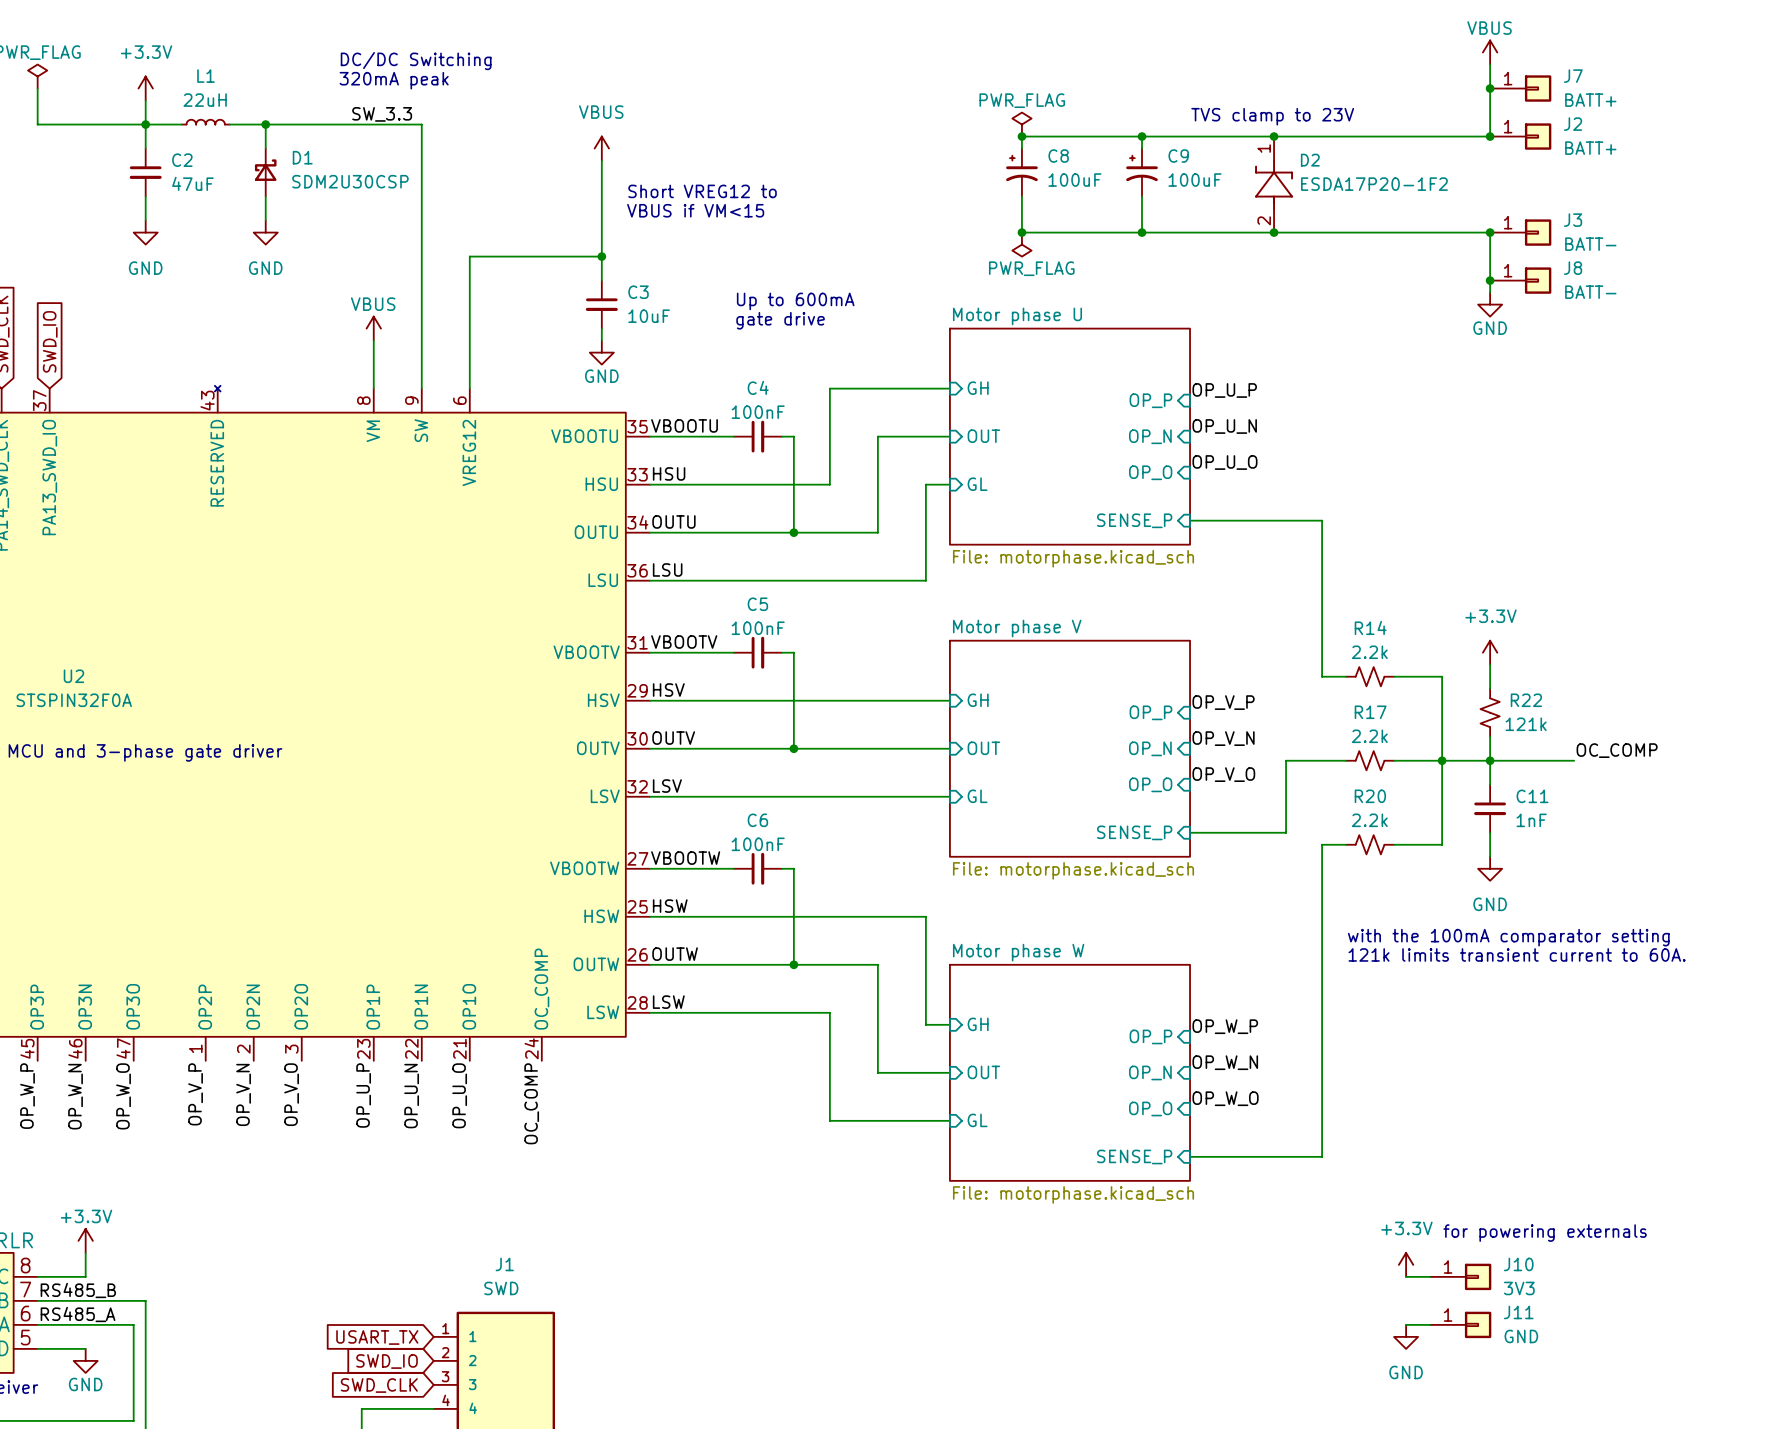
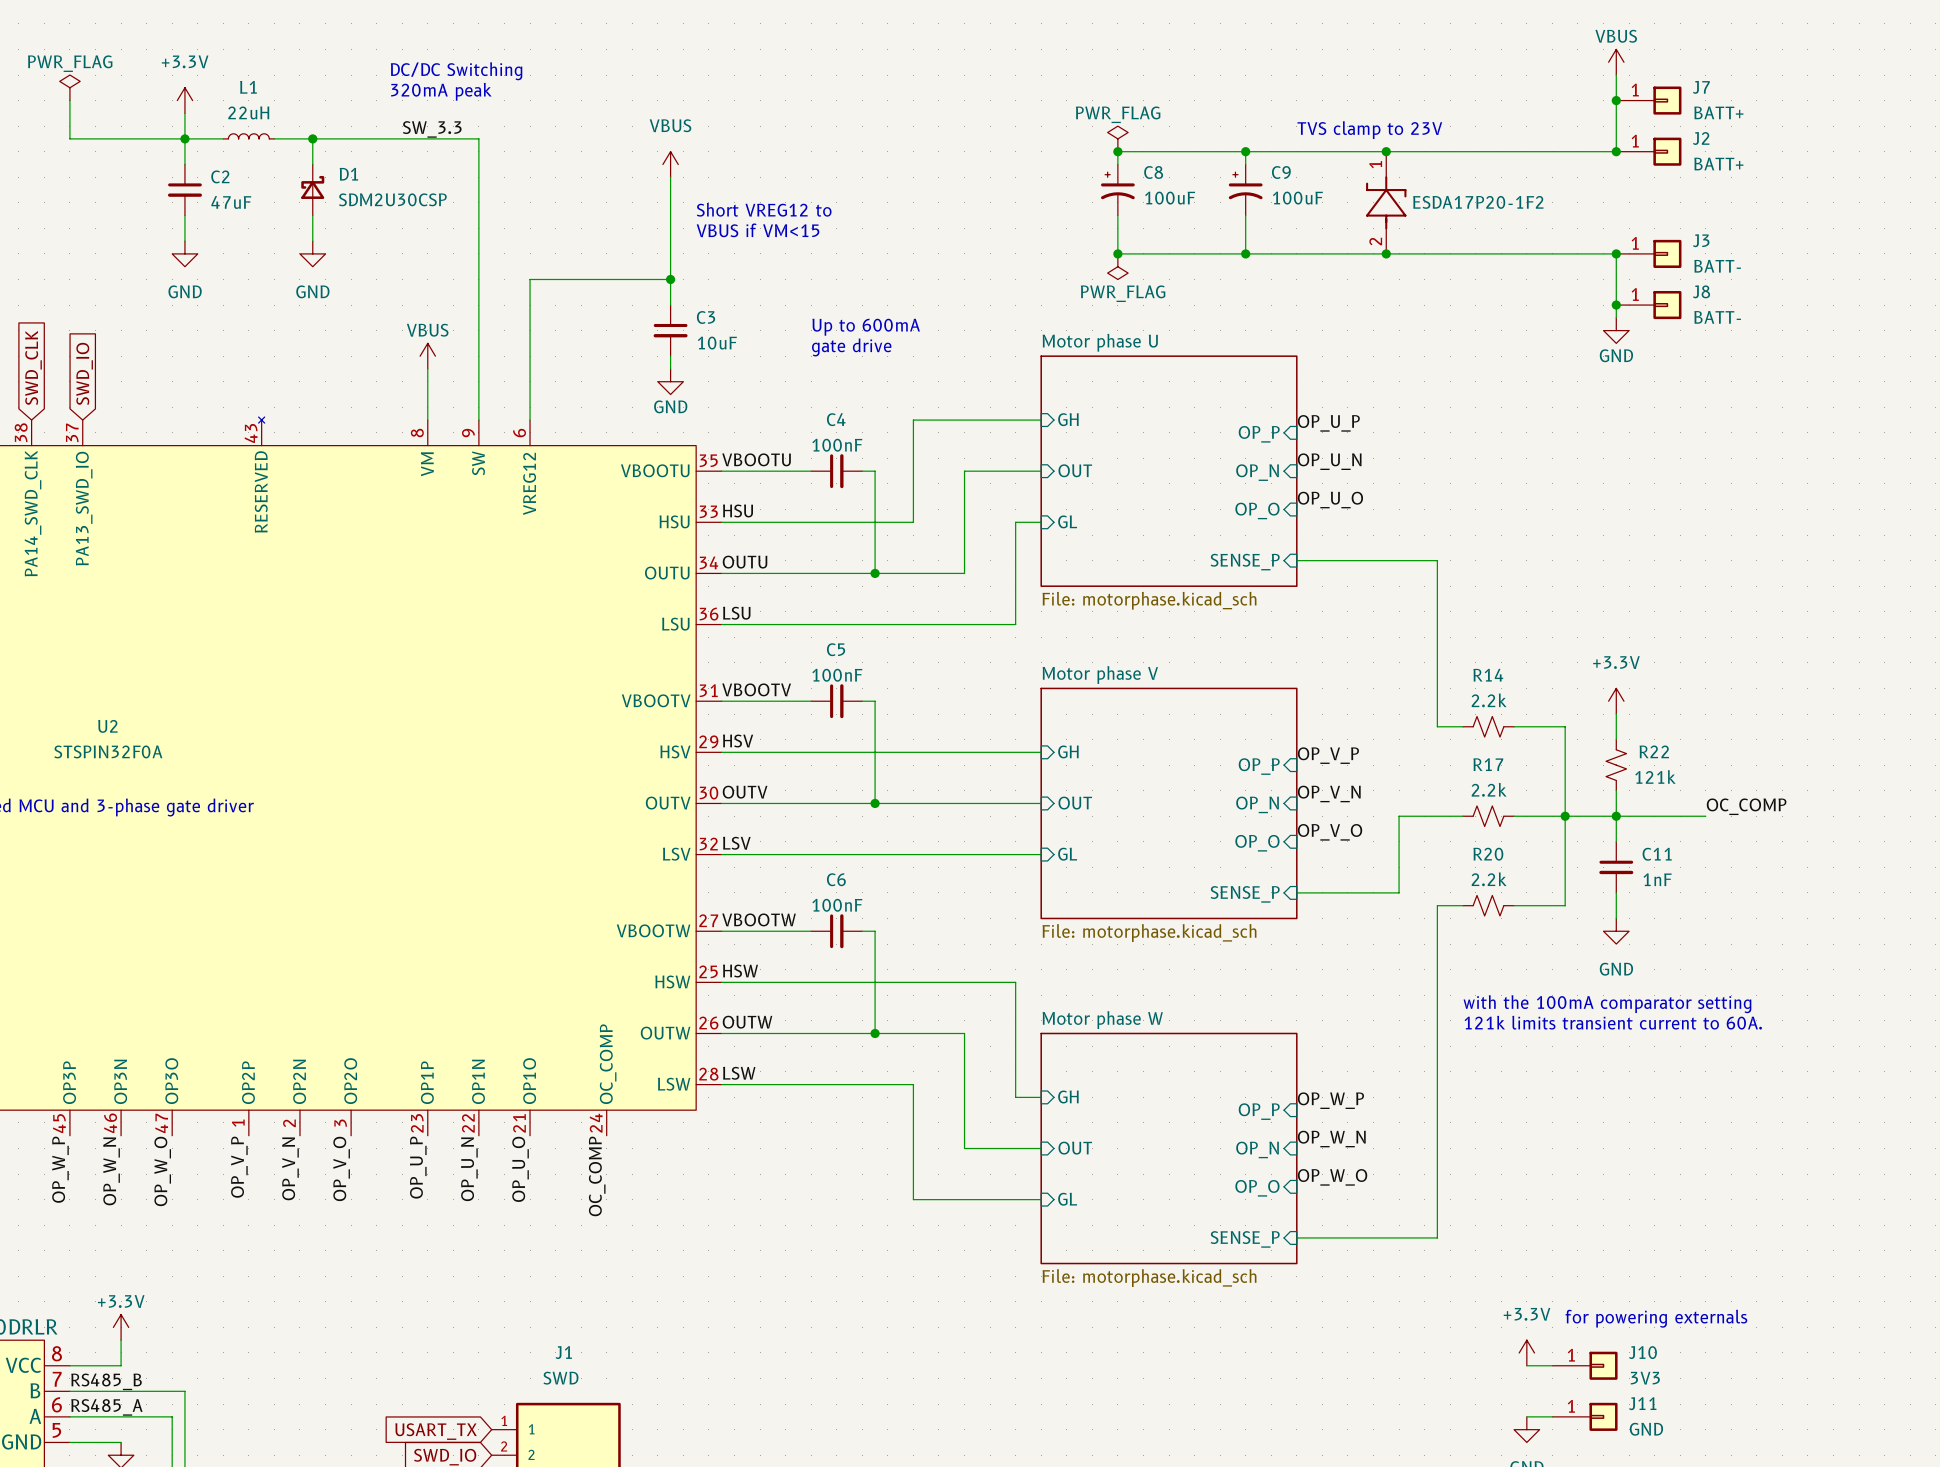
D2 name: D2 (1310, 160) -> none

